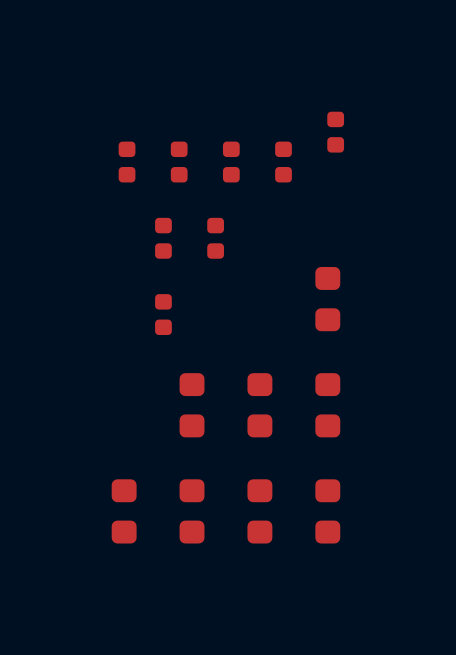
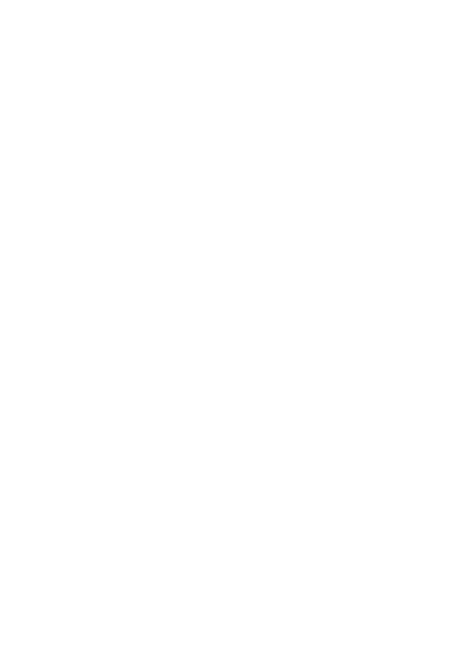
part: (335, 132) -> none
part: (127, 162) -> none
part: (179, 162) -> none
part: (231, 162) -> none
part: (283, 162) -> none
part: (163, 238) -> none
part: (215, 238) -> none
part: (327, 299) -> none
part: (163, 314) -> none
part: (192, 405) -> none
part: (259, 405) -> none
part: (327, 405) -> none
part: (124, 511) -> none
part: (192, 511) -> none
part: (259, 511) -> none
part: (327, 511) -> none

